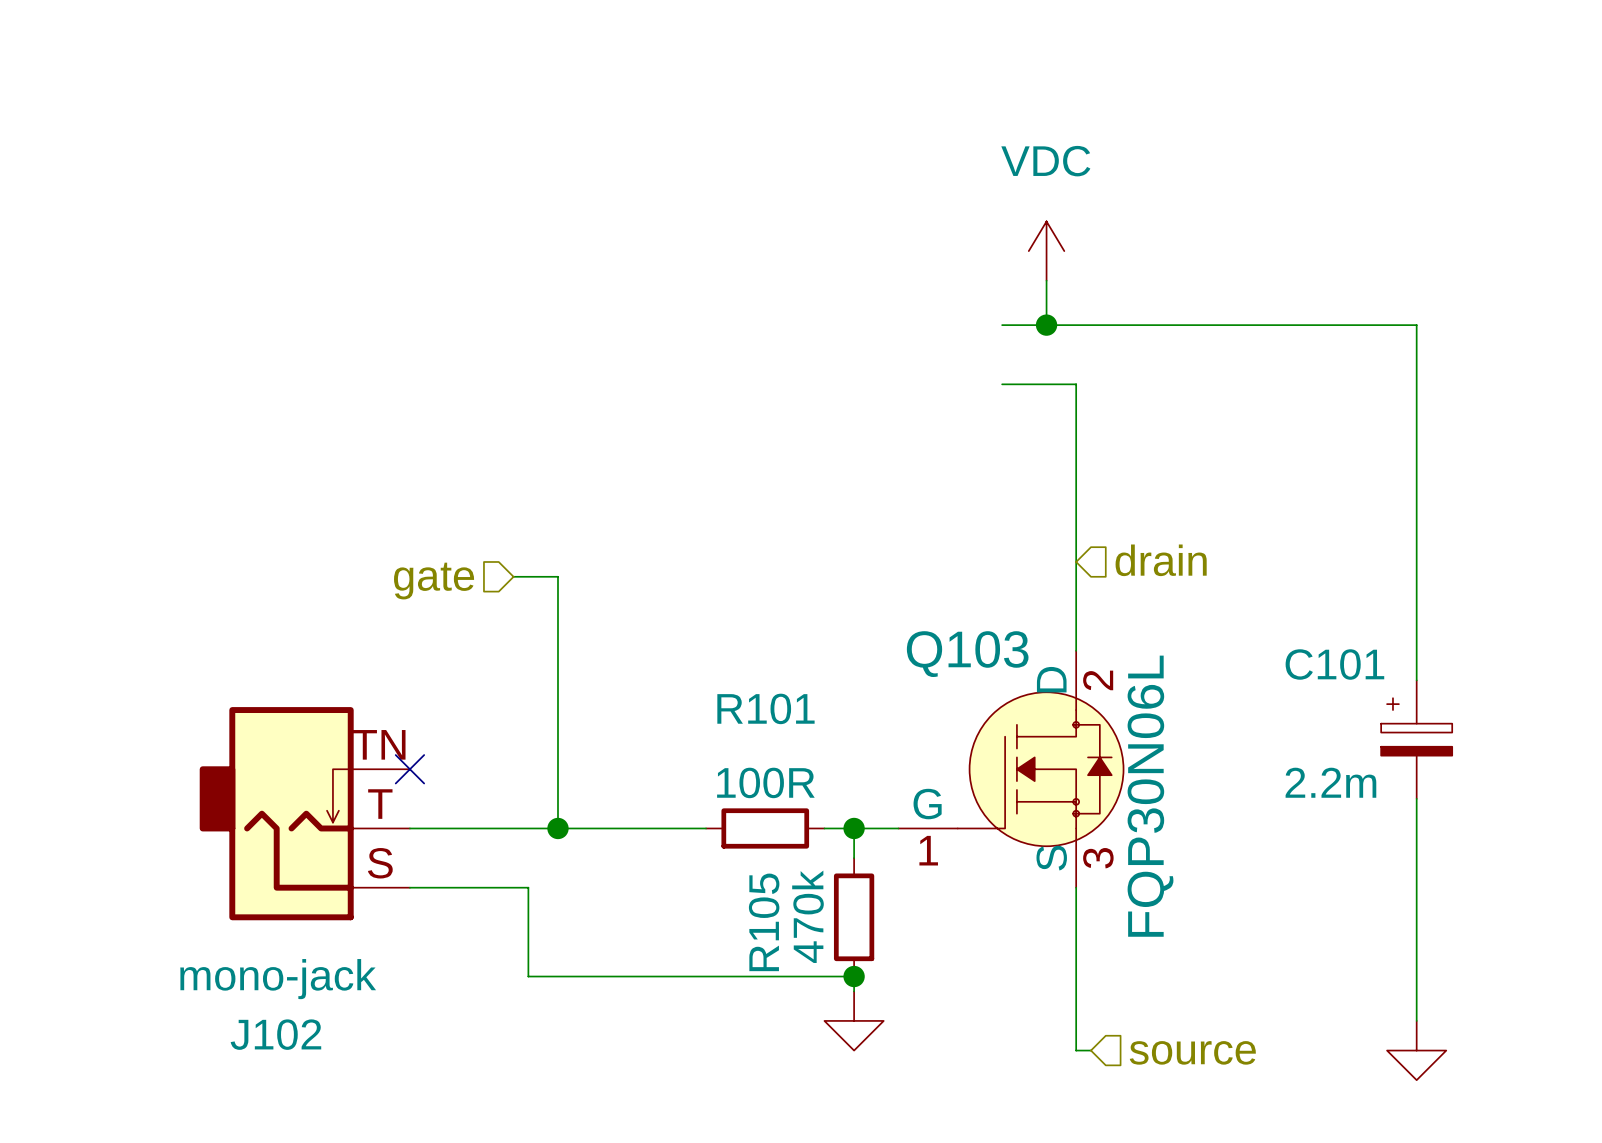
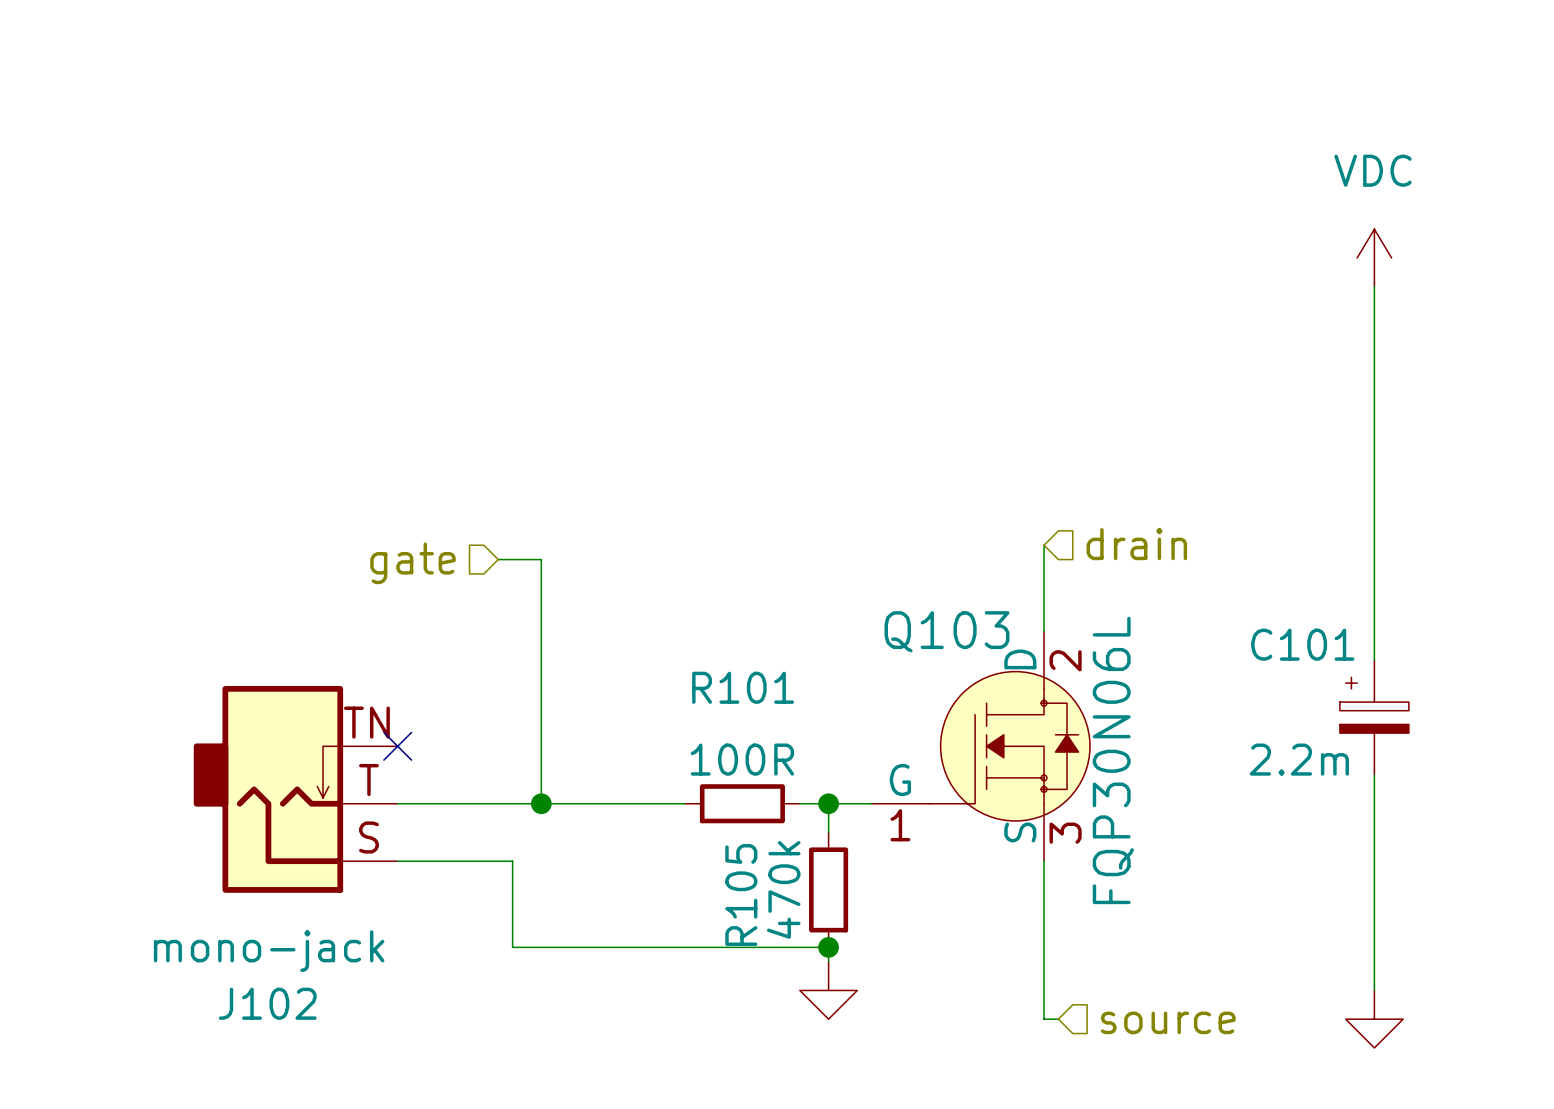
power symbol position: VDC (1046, 251) -> VDC (1374, 257)
wire: (1046, 280) (1046, 325) -> none
wire: (1002, 325) (1416, 325) -> (1374, 286) (1374, 315)
junction: (1046, 325) -> none
wire: (1002, 384) (1076, 384) (1076, 561) -> none

